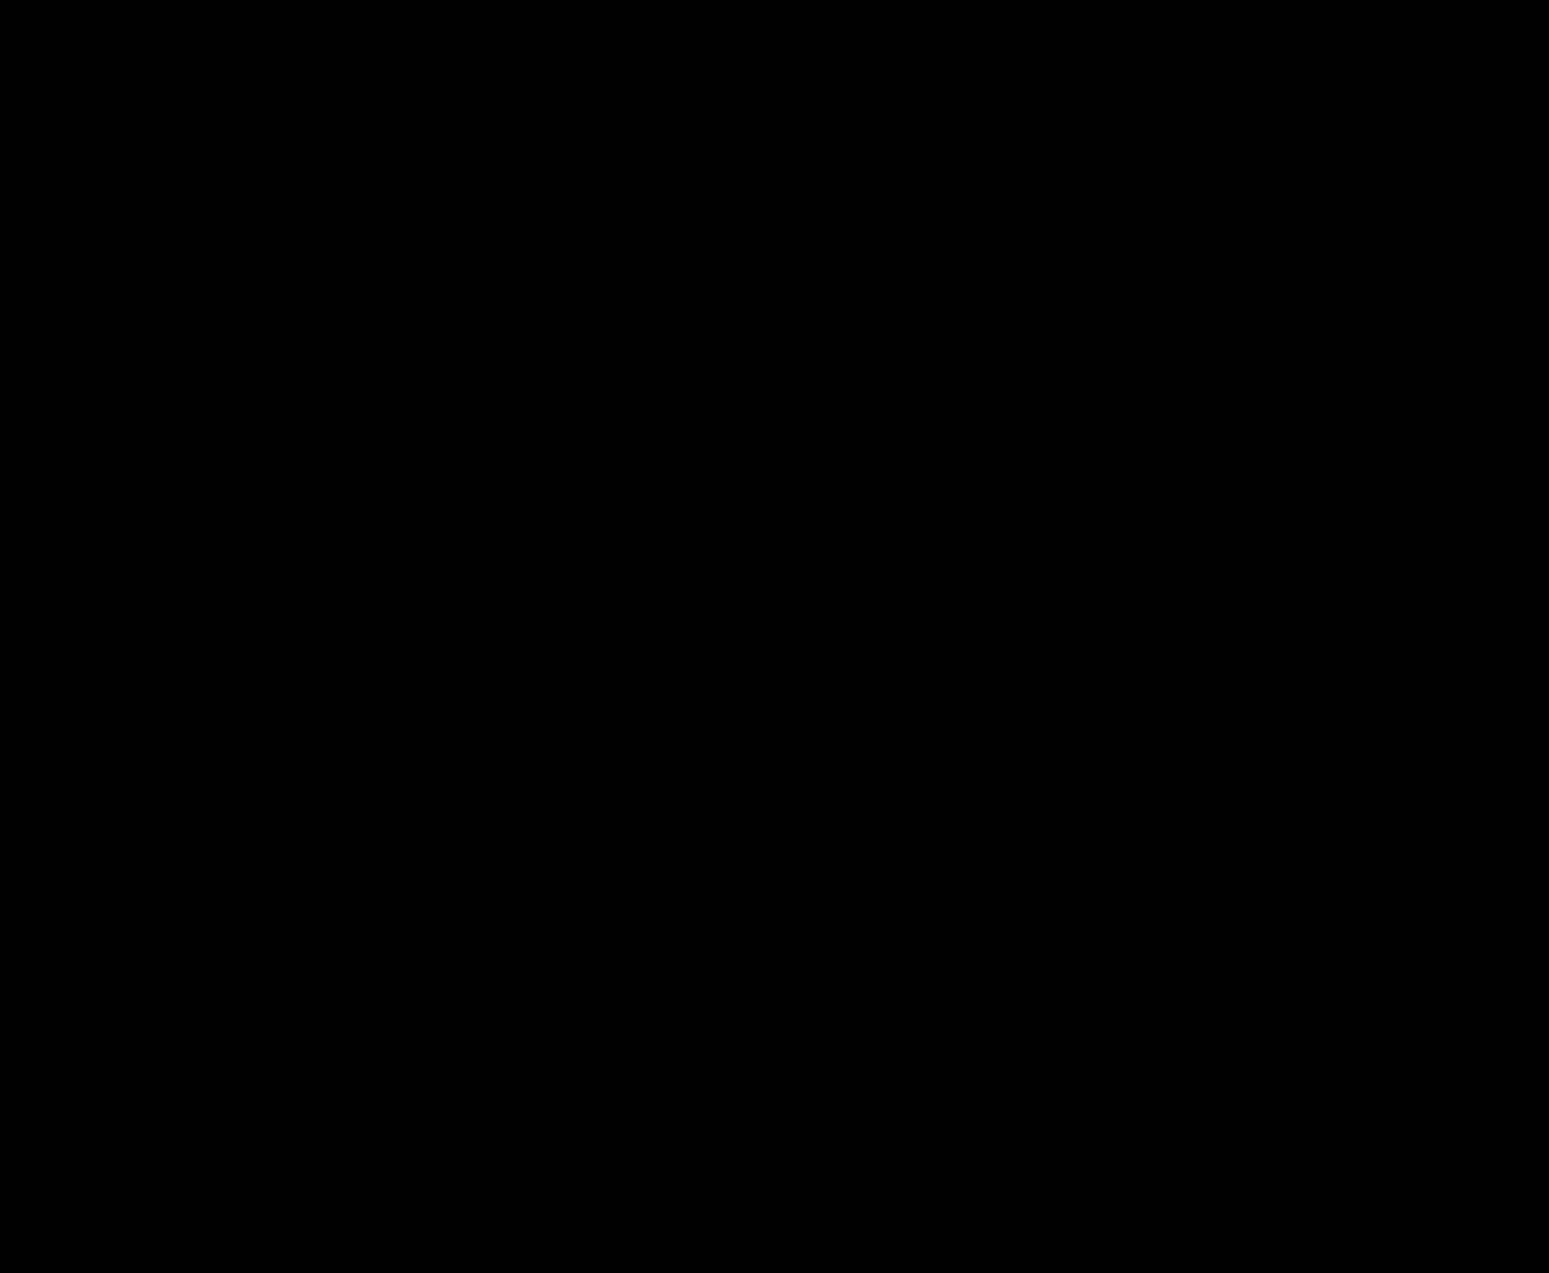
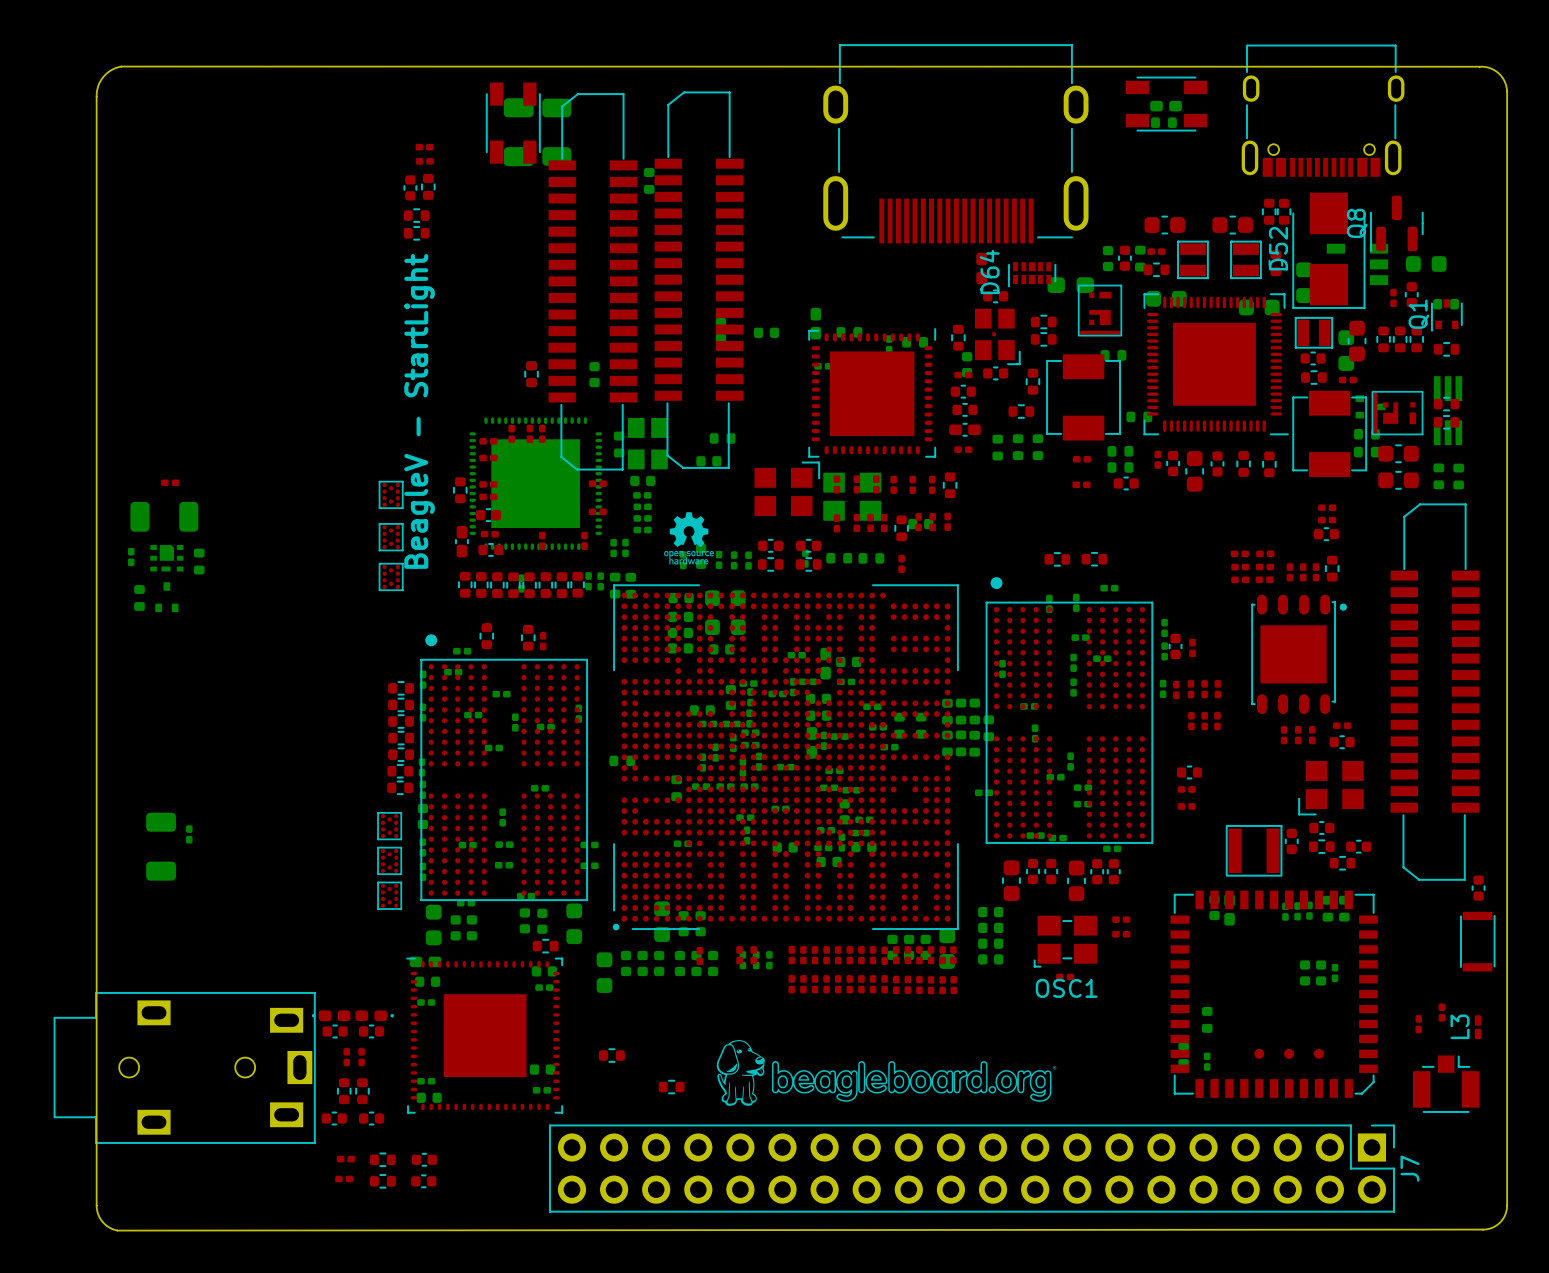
board edge: none -> (1479, 66) (121, 66) (108, 72) (99, 82) (96, 96) (96, 1205) (98, 1214) (102, 1221) (109, 1227) (117, 1230) (1483, 1229) (1497, 1224) (1505, 1214) (1507, 1205) (1507, 91) (1504, 80) (1498, 73) (1491, 68) (1479, 66)
part: none -> (1166, 104)
part: none -> (1166, 106)
part: none -> (1323, 110)
part: none -> (1163, 122)
part: none -> (513, 123)
part: none -> (518, 132)
part: none -> (556, 132)
part: none -> (955, 143)
part: none -> (424, 147)
part: none -> (424, 161)
part: none -> (649, 180)
part: none -> (428, 186)
part: none -> (410, 187)
part: none -> (1269, 211)
part: none -> (1284, 211)
part: none -> (416, 215)
Q8: none -> (1396, 223)
part: none -> (1164, 225)
part: none -> (1232, 225)
part: none -> (416, 233)
D52: none -> (1328, 250)
part: none -> (1156, 251)
part: none -> (1107, 258)
part: none -> (1124, 258)
part: none -> (1140, 258)
part: none -> (1192, 259)
part: none -> (1245, 259)
part: none -> (1275, 263)
part: none -> (1357, 264)
part: none -> (1426, 264)
part: none -> (1156, 269)
part: none -> (981, 271)
D64: none -> (1032, 274)
part: none -> (698, 280)
part: none -> (592, 281)
part: none -> (1304, 282)
part: none -> (1070, 285)
part: none -> (1411, 294)
part: none -> (995, 296)
part: none -> (1393, 297)
part: none -> (1166, 298)
part: none -> (1446, 304)
part: none -> (1259, 307)
part: none -> (1100, 310)
Q1: none -> (1446, 315)
part: none -> (1043, 322)
part: none -> (815, 323)
part: none -> (720, 330)
part: none -> (766, 332)
part: none -> (849, 332)
part: none -> (1313, 332)
top track: none -> (994, 333) (994, 334)
part: none -> (997, 336)
part: none -> (958, 337)
part: none -> (1043, 339)
part: none -> (1383, 339)
part: none -> (1400, 339)
part: none -> (1416, 339)
part: none -> (1357, 341)
part: none -> (915, 342)
part: none -> (889, 344)
part: none -> (1446, 349)
part: none -> (1346, 350)
part: none -> (1113, 355)
part: none -> (1313, 358)
part: none -> (967, 364)
part: none -> (1216, 364)
part: none -> (823, 366)
part: none -> (995, 373)
part: none -> (531, 374)
part: none -> (594, 374)
part: none -> (963, 375)
part: none -> (1313, 377)
part: none -> (1347, 380)
part: none -> (1032, 381)
part: none -> (963, 391)
part: none -> (872, 392)
part: none -> (1083, 397)
part: none -> (1446, 404)
part: none -> (1370, 406)
part: none -> (965, 409)
part: none -> (1448, 410)
text: none -> BeagleV - StartLight (419, 411)
part: none -> (1021, 411)
part: none -> (1397, 413)
part: none -> (1139, 416)
part: none -> (1446, 422)
part: none -> (965, 429)
part: none -> (511, 433)
part: none -> (529, 433)
part: none -> (542, 433)
part: none -> (1329, 433)
part: none -> (1366, 434)
part: none -> (722, 438)
part: none -> (488, 441)
part: none -> (647, 443)
part: none -> (619, 444)
part: none -> (997, 447)
part: none -> (1018, 447)
part: none -> (1037, 447)
part: none -> (963, 449)
part: none -> (1120, 451)
part: none -> (1366, 452)
part: none -> (1398, 453)
part: none -> (488, 457)
part: none -> (1082, 459)
part: none -> (1157, 459)
part: none -> (708, 461)
part: none -> (1173, 463)
part: none -> (1217, 463)
part: none -> (1243, 463)
part: none -> (1269, 464)
part: none -> (1120, 467)
part: none -> (1194, 471)
part: none -> (1438, 476)
part: none -> (1458, 476)
part: none -> (642, 480)
part: none -> (1398, 480)
part: none -> (170, 482)
part: none -> (535, 483)
part: none -> (597, 483)
part: none -> (1126, 483)
part: none -> (488, 484)
part: none -> (836, 484)
part: none -> (856, 484)
part: none -> (876, 484)
part: none -> (893, 484)
part: none -> (912, 484)
part: none -> (932, 484)
part: none -> (1081, 484)
part: none -> (950, 485)
part: none -> (787, 488)
part: none -> (460, 490)
part: none -> (642, 495)
part: none -> (391, 496)
part: none -> (488, 496)
part: none -> (852, 496)
part: none -> (642, 506)
part: none -> (1327, 507)
part: none -> (597, 511)
drawing: none -> [664, 512, 714, 565]
part: none -> (488, 515)
part: none -> (164, 516)
part: none -> (642, 518)
part: none -> (1327, 520)
part: none -> (947, 521)
part: none -> (918, 522)
part: none -> (932, 522)
part: none -> (836, 523)
part: none -> (856, 523)
part: none -> (870, 523)
part: none -> (884, 523)
part: none -> (920, 524)
part: none -> (901, 528)
part: none -> (642, 530)
part: none -> (489, 534)
part: none -> (1326, 534)
part: none -> (391, 539)
part: none -> (542, 540)
part: none -> (584, 540)
part: none -> (461, 541)
part: none -> (770, 545)
part: none -> (808, 545)
part: none -> (625, 547)
part: none -> (613, 548)
part: none -> (490, 549)
part: none -> (1239, 553)
part: none -> (1265, 553)
part: none -> (131, 556)
part: none -> (701, 556)
part: none -> (166, 558)
part: none -> (805, 558)
part: none -> (839, 558)
part: none -> (871, 558)
part: none -> (719, 559)
part: none -> (1057, 559)
part: none -> (1094, 559)
part: none -> (683, 560)
part: none -> (734, 560)
part: none -> (748, 560)
part: none -> (199, 561)
part: none -> (901, 563)
part: none -> (770, 564)
part: none -> (808, 564)
part: none -> (1240, 567)
part: none -> (1265, 567)
part: none -> (1332, 568)
part: none -> (1289, 572)
part: none -> (1303, 572)
part: none -> (1316, 572)
part: none -> (391, 578)
part: none -> (1240, 579)
part: none -> (1264, 579)
part: none -> (588, 581)
part: none -> (600, 581)
part: none -> (521, 583)
part: none -> (465, 584)
part: none -> (481, 584)
part: none -> (577, 584)
part: none -> (497, 585)
part: none -> (513, 585)
part: none -> (529, 585)
part: none -> (545, 585)
part: none -> (561, 585)
part: none -> (615, 585)
part: none -> (630, 585)
part: none -> (1109, 588)
part: none -> (166, 597)
part: none -> (139, 598)
part: none -> (681, 598)
part: none -> (725, 598)
part: none -> (1076, 602)
part: none -> (1049, 603)
part: none -> (680, 616)
part: none -> (725, 627)
part: none -> (1164, 628)
part: none -> (680, 632)
part: none -> (486, 636)
part: none -> (528, 637)
part: none -> (1080, 637)
part: none -> (543, 641)
part: none -> (1175, 646)
part: none -> (680, 648)
part: none -> (1192, 648)
part: none -> (721, 649)
part: none -> (462, 651)
part: none -> (1164, 651)
part: none -> (1299, 654)
part: none -> (796, 655)
part: none -> (1102, 658)
part: none -> (848, 662)
part: none -> (1073, 662)
part: none -> (825, 663)
part: none -> (1002, 668)
part: none -> (453, 672)
part: none -> (423, 679)
part: none -> (808, 681)
part: none -> (846, 681)
part: none -> (748, 683)
part: none -> (793, 687)
part: none -> (1073, 687)
part: none -> (401, 688)
part: none -> (1163, 688)
part: none -> (1190, 689)
part: none -> (1204, 689)
part: none -> (1217, 689)
part: none -> (1176, 690)
part: none -> (1434, 692)
part: none -> (777, 693)
part: none -> (501, 694)
part: none -> (730, 697)
part: none -> (750, 697)
part: none -> (818, 698)
part: none -> (401, 704)
part: none -> (872, 706)
part: none -> (1029, 706)
part: none -> (702, 710)
part: none -> (1069, 710)
part: none -> (947, 711)
part: none -> (961, 711)
part: none -> (974, 711)
part: none -> (422, 712)
part: none -> (578, 713)
part: none -> (473, 715)
part: none -> (818, 715)
part: none -> (749, 718)
part: none -> (401, 721)
part: none -> (1191, 721)
part: none -> (1204, 721)
part: none -> (1217, 721)
part: none -> (515, 722)
part: none -> (708, 723)
part: none -> (731, 723)
part: none -> (899, 725)
part: none -> (921, 725)
part: none -> (1342, 725)
part: none -> (545, 726)
part: none -> (877, 727)
part: none -> (988, 728)
part: none -> (750, 732)
part: none -> (1035, 733)
part: none -> (1284, 735)
part: none -> (1298, 735)
part: none -> (1312, 735)
part: none -> (839, 736)
part: none -> (401, 738)
part: none -> (823, 740)
part: none -> (811, 742)
part: none -> (1342, 742)
part: none -> (733, 743)
part: none -> (947, 743)
part: none -> (961, 743)
part: none -> (974, 743)
part: none -> (750, 745)
part: none -> (889, 747)
part: none -> (493, 748)
part: none -> (715, 752)
part: none -> (401, 754)
part: none -> (785, 757)
part: none -> (622, 760)
part: none -> (759, 761)
part: none -> (1070, 761)
part: none -> (702, 762)
part: none -> (421, 767)
part: none -> (504, 767)
part: none -> (742, 767)
part: none -> (785, 767)
part: none -> (834, 770)
part: none -> (400, 771)
part: none -> (1189, 772)
part: none -> (1055, 777)
part: none -> (701, 786)
part: none -> (725, 786)
part: none -> (749, 786)
part: none -> (400, 787)
part: none -> (829, 787)
part: none -> (1082, 787)
part: none -> (539, 788)
part: none -> (676, 788)
part: none -> (1330, 788)
part: none -> (422, 789)
part: none -> (1186, 789)
part: none -> (851, 790)
part: none -> (984, 792)
part: none -> (1082, 804)
part: none -> (1186, 806)
part: none -> (780, 808)
part: none -> (844, 811)
part: none -> (422, 816)
part: none -> (502, 817)
part: none -> (745, 817)
part: none -> (864, 819)
part: none -> (389, 828)
part: none -> (1321, 828)
part: none -> (826, 830)
part: none -> (860, 833)
part: none -> (189, 834)
part: none -> (747, 835)
part: none -> (1035, 835)
part: none -> (1057, 838)
part: none -> (1291, 841)
part: none -> (841, 842)
part: none -> (682, 843)
part: none -> (504, 844)
part: none -> (467, 845)
part: none -> (589, 845)
part: none -> (161, 846)
part: none -> (1321, 846)
part: none -> (1358, 846)
part: none -> (422, 847)
part: none -> (785, 847)
part: none -> (823, 847)
part: none -> (863, 847)
part: none -> (1112, 848)
part: none -> (1254, 850)
part: none -> (829, 861)
part: none -> (389, 862)
part: none -> (1342, 863)
part: none -> (504, 865)
part: none -> (589, 865)
part: none -> (422, 871)
part: none -> (1032, 871)
part: none -> (1051, 871)
part: none -> (1097, 871)
part: none -> (1113, 871)
part: none -> (1011, 880)
part: none -> (1076, 880)
part: none -> (1478, 888)
part: none -> (526, 896)
part: none -> (389, 897)
part: none -> (466, 903)
part: none -> (1214, 907)
part: none -> (1327, 908)
part: none -> (1344, 908)
part: none -> (1229, 909)
part: none -> (1309, 910)
part: none -> (1285, 911)
part: none -> (1297, 911)
part: none -> (990, 912)
part: none -> (1121, 919)
part: none -> (524, 920)
part: none -> (542, 921)
part: none -> (662, 921)
part: none -> (574, 923)
part: none -> (683, 923)
part: none -> (700, 923)
part: none -> (433, 924)
part: none -> (455, 927)
part: none -> (471, 927)
part: none -> (990, 927)
part: none -> (1121, 934)
OSC1: none -> (1065, 941)
part: none -> (1477, 941)
part: none -> (990, 943)
part: none -> (545, 946)
part: none -> (892, 947)
part: none -> (909, 947)
part: none -> (925, 947)
part: none -> (947, 948)
part: none -> (739, 955)
part: none -> (753, 955)
part: none -> (791, 955)
part: none -> (803, 955)
part: none -> (815, 955)
part: none -> (826, 955)
part: none -> (838, 955)
part: none -> (849, 955)
part: none -> (861, 955)
part: none -> (873, 955)
part: none -> (884, 955)
part: none -> (896, 955)
part: none -> (907, 955)
part: none -> (919, 955)
part: none -> (931, 955)
part: none -> (942, 955)
part: none -> (953, 955)
part: none -> (699, 956)
part: none -> (990, 959)
part: none -> (742, 960)
part: none -> (756, 960)
part: none -> (769, 960)
part: none -> (425, 961)
part: none -> (626, 963)
part: none -> (642, 963)
part: none -> (659, 963)
part: none -> (679, 963)
part: none -> (696, 963)
part: none -> (713, 963)
part: none -> (544, 971)
part: none -> (604, 972)
part: none -> (1305, 972)
part: none -> (1321, 972)
part: none -> (1335, 972)
part: none -> (1065, 976)
part: none -> (427, 981)
part: none -> (791, 984)
part: none -> (803, 984)
part: none -> (815, 984)
part: none -> (826, 984)
part: none -> (838, 984)
part: none -> (849, 984)
part: none -> (861, 984)
part: none -> (873, 984)
part: none -> (884, 984)
part: none -> (896, 984)
part: none -> (907, 984)
part: none -> (919, 984)
part: none -> (931, 985)
part: none -> (942, 985)
part: none -> (953, 985)
part: none -> (544, 987)
part: none -> (1274, 994)
part: none -> (426, 1002)
part: none -> (1441, 1012)
part: none -> (331, 1015)
part: none -> (374, 1015)
part: none -> (1207, 1019)
part: none -> (1418, 1024)
L3: none -> (1478, 1027)
part: none -> (335, 1031)
part: none -> (371, 1031)
part: none -> (484, 1035)
drawing: none -> [716, 1040, 1057, 1106]
part: none -> (611, 1055)
part: none -> (1183, 1055)
part: none -> (346, 1057)
part: none -> (361, 1057)
part: none -> (1207, 1061)
part: none -> (184, 1067)
part: none -> (542, 1069)
part: none -> (426, 1081)
part: none -> (1446, 1084)
part: none -> (671, 1087)
part: none -> (541, 1090)
part: none -> (344, 1091)
part: none -> (362, 1091)
part: none -> (429, 1097)
part: none -> (334, 1118)
part: none -> (371, 1118)
part: none -> (345, 1159)
part: none -> (382, 1159)
part: none -> (424, 1159)
J7: none -> (971, 1168)
part: none -> (344, 1179)
part: none -> (382, 1181)
part: none -> (423, 1181)

